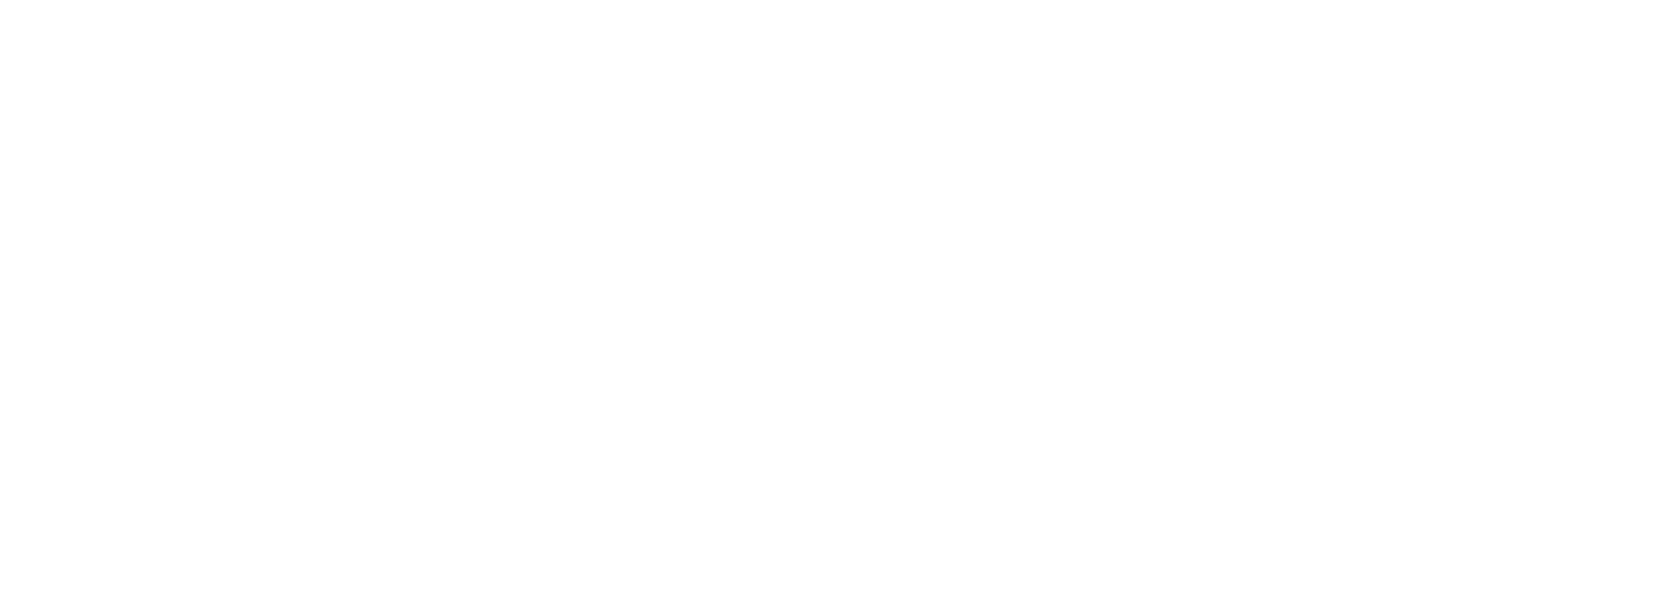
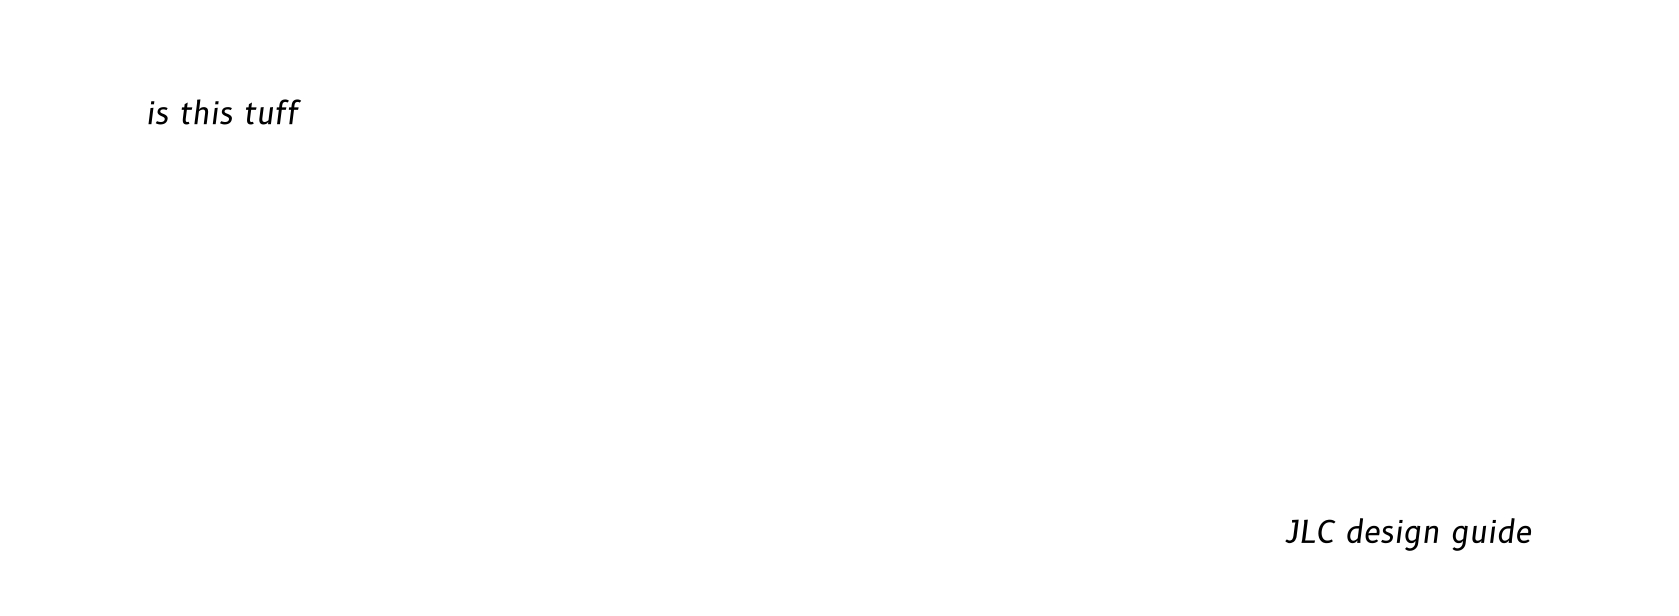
text: none -> is this tuff (224, 111)
text: none -> JLC design guide (1408, 534)

